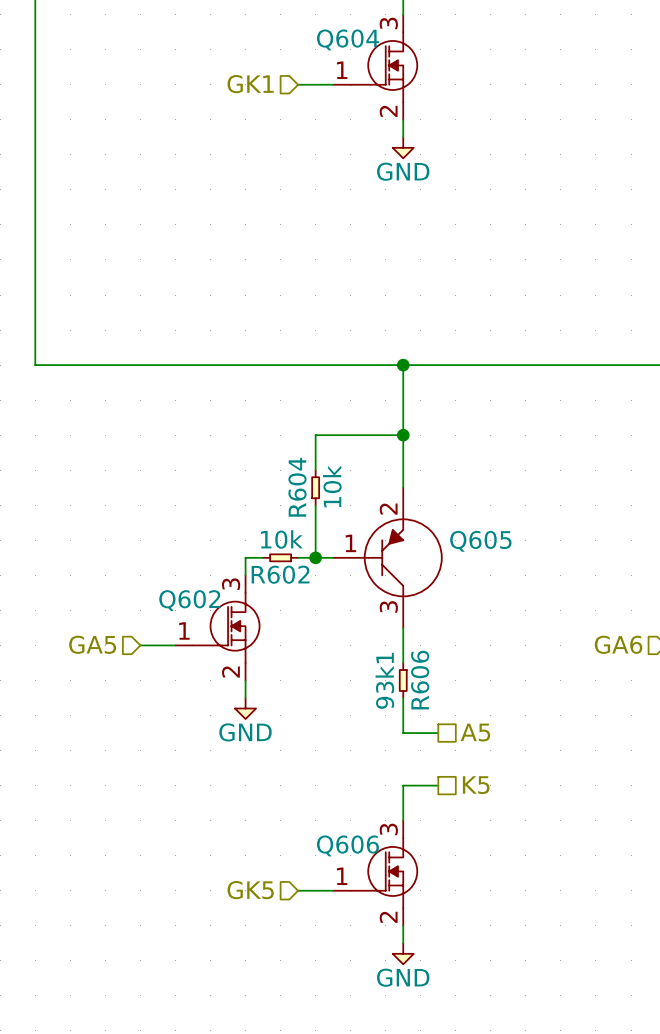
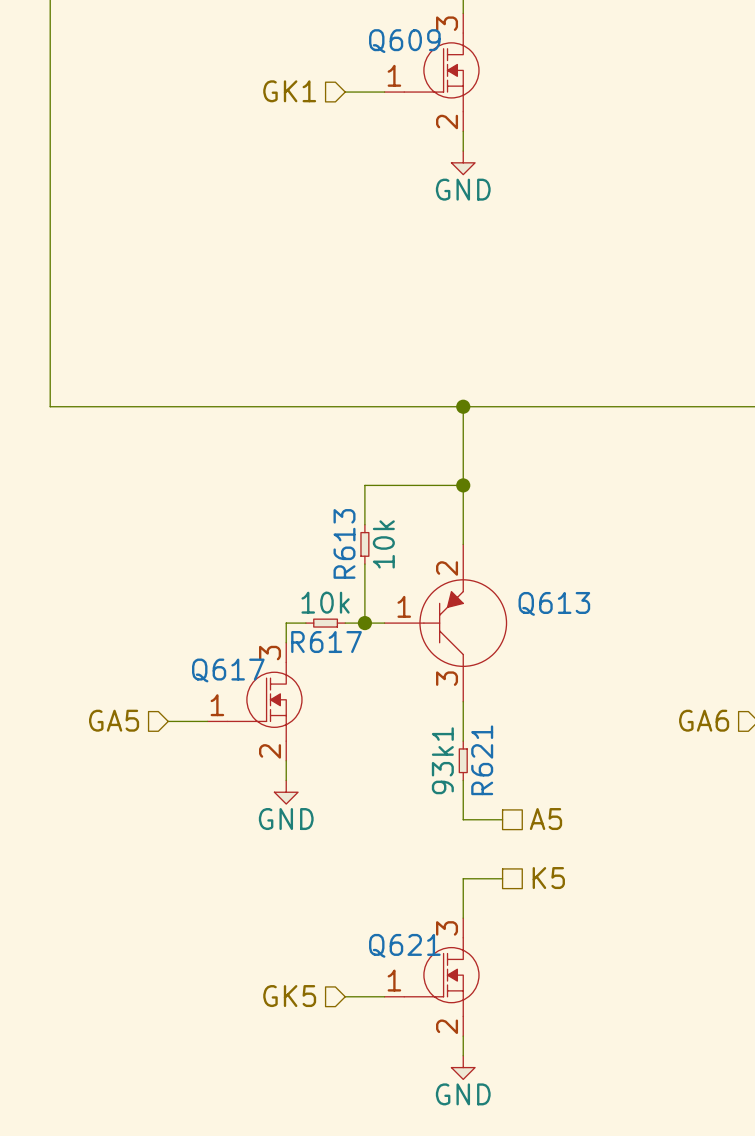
Q604 name: Q604 (348, 39) -> Q609 (404, 41)
R604 name: R604 (297, 487) -> R613 (344, 543)
Q605 name: Q605 (480, 541) -> Q613 (554, 603)
R602 name: R602 (280, 574) -> R617 (326, 642)
Q602 name: Q602 (189, 600) -> Q617 (228, 670)
R606 name: R606 (420, 680) -> R621 (482, 760)
Q606 name: Q606 (347, 845) -> Q621 (404, 945)

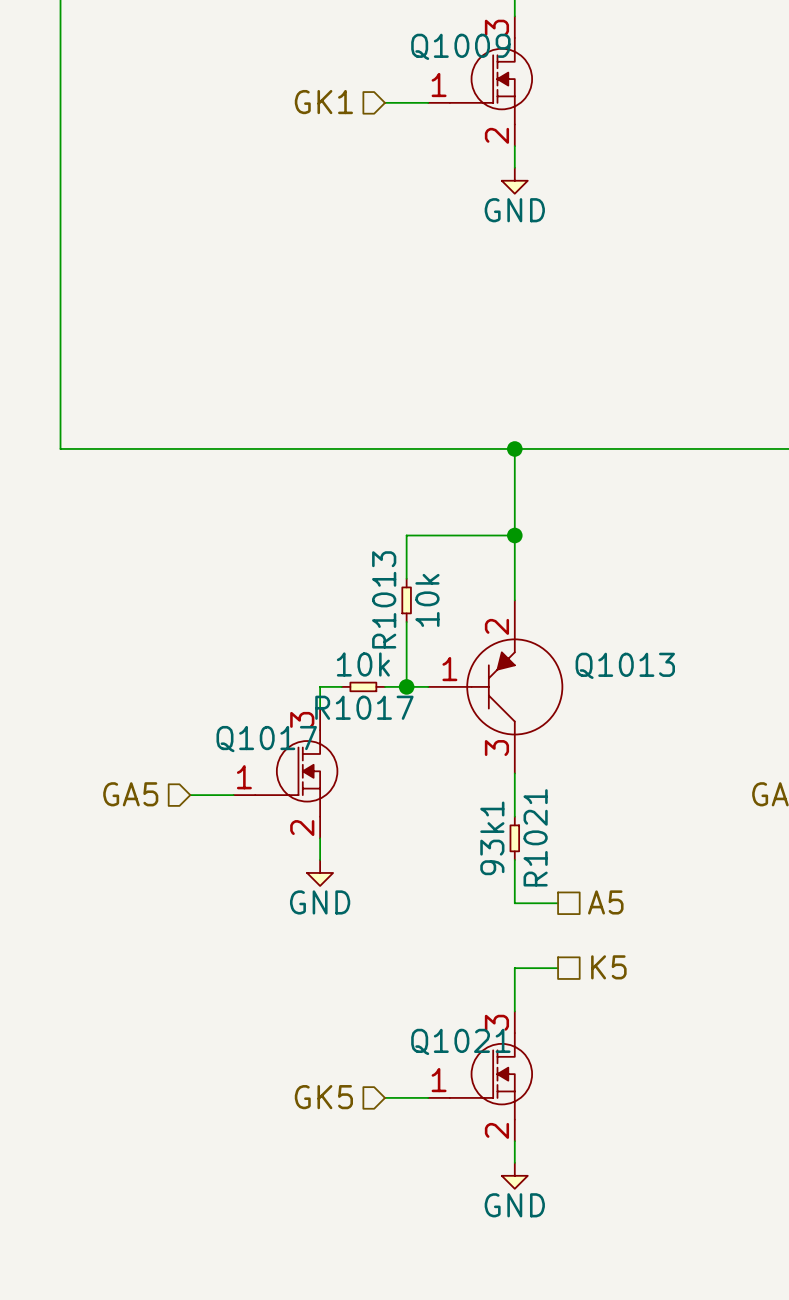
Q609 name: Q609 (404, 41) -> Q1009 (460, 46)
R613 name: R613 (344, 543) -> R1013 (384, 599)
Q613 name: Q613 (554, 603) -> Q1013 (625, 665)
R617 name: R617 (326, 642) -> R1017 (364, 707)
Q617 name: Q617 (228, 670) -> Q1017 (266, 739)
R621 name: R621 (482, 760) -> R1021 (535, 837)
Q621 name: Q621 (404, 945) -> Q1021 (460, 1041)

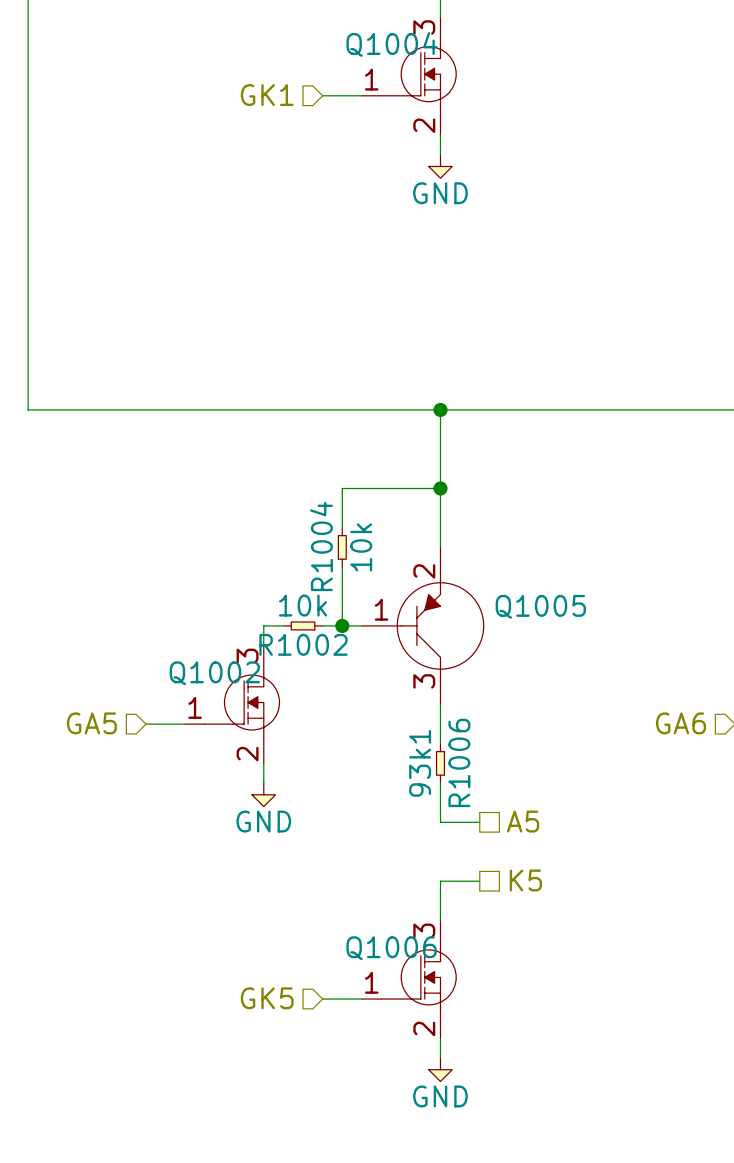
Q1009 name: Q1009 (460, 46) -> Q1004 (392, 44)
R1013 name: R1013 (384, 599) -> R1004 (321, 546)
Q1013 name: Q1013 (625, 665) -> Q1005 (540, 606)
R1017 name: R1017 (364, 707) -> R1002 (303, 644)
Q1017 name: Q1017 (266, 739) -> Q1002 (214, 673)
R1021 name: R1021 (535, 837) -> R1006 (459, 762)
Q1021 name: Q1021 (460, 1041) -> Q1006 (391, 948)

